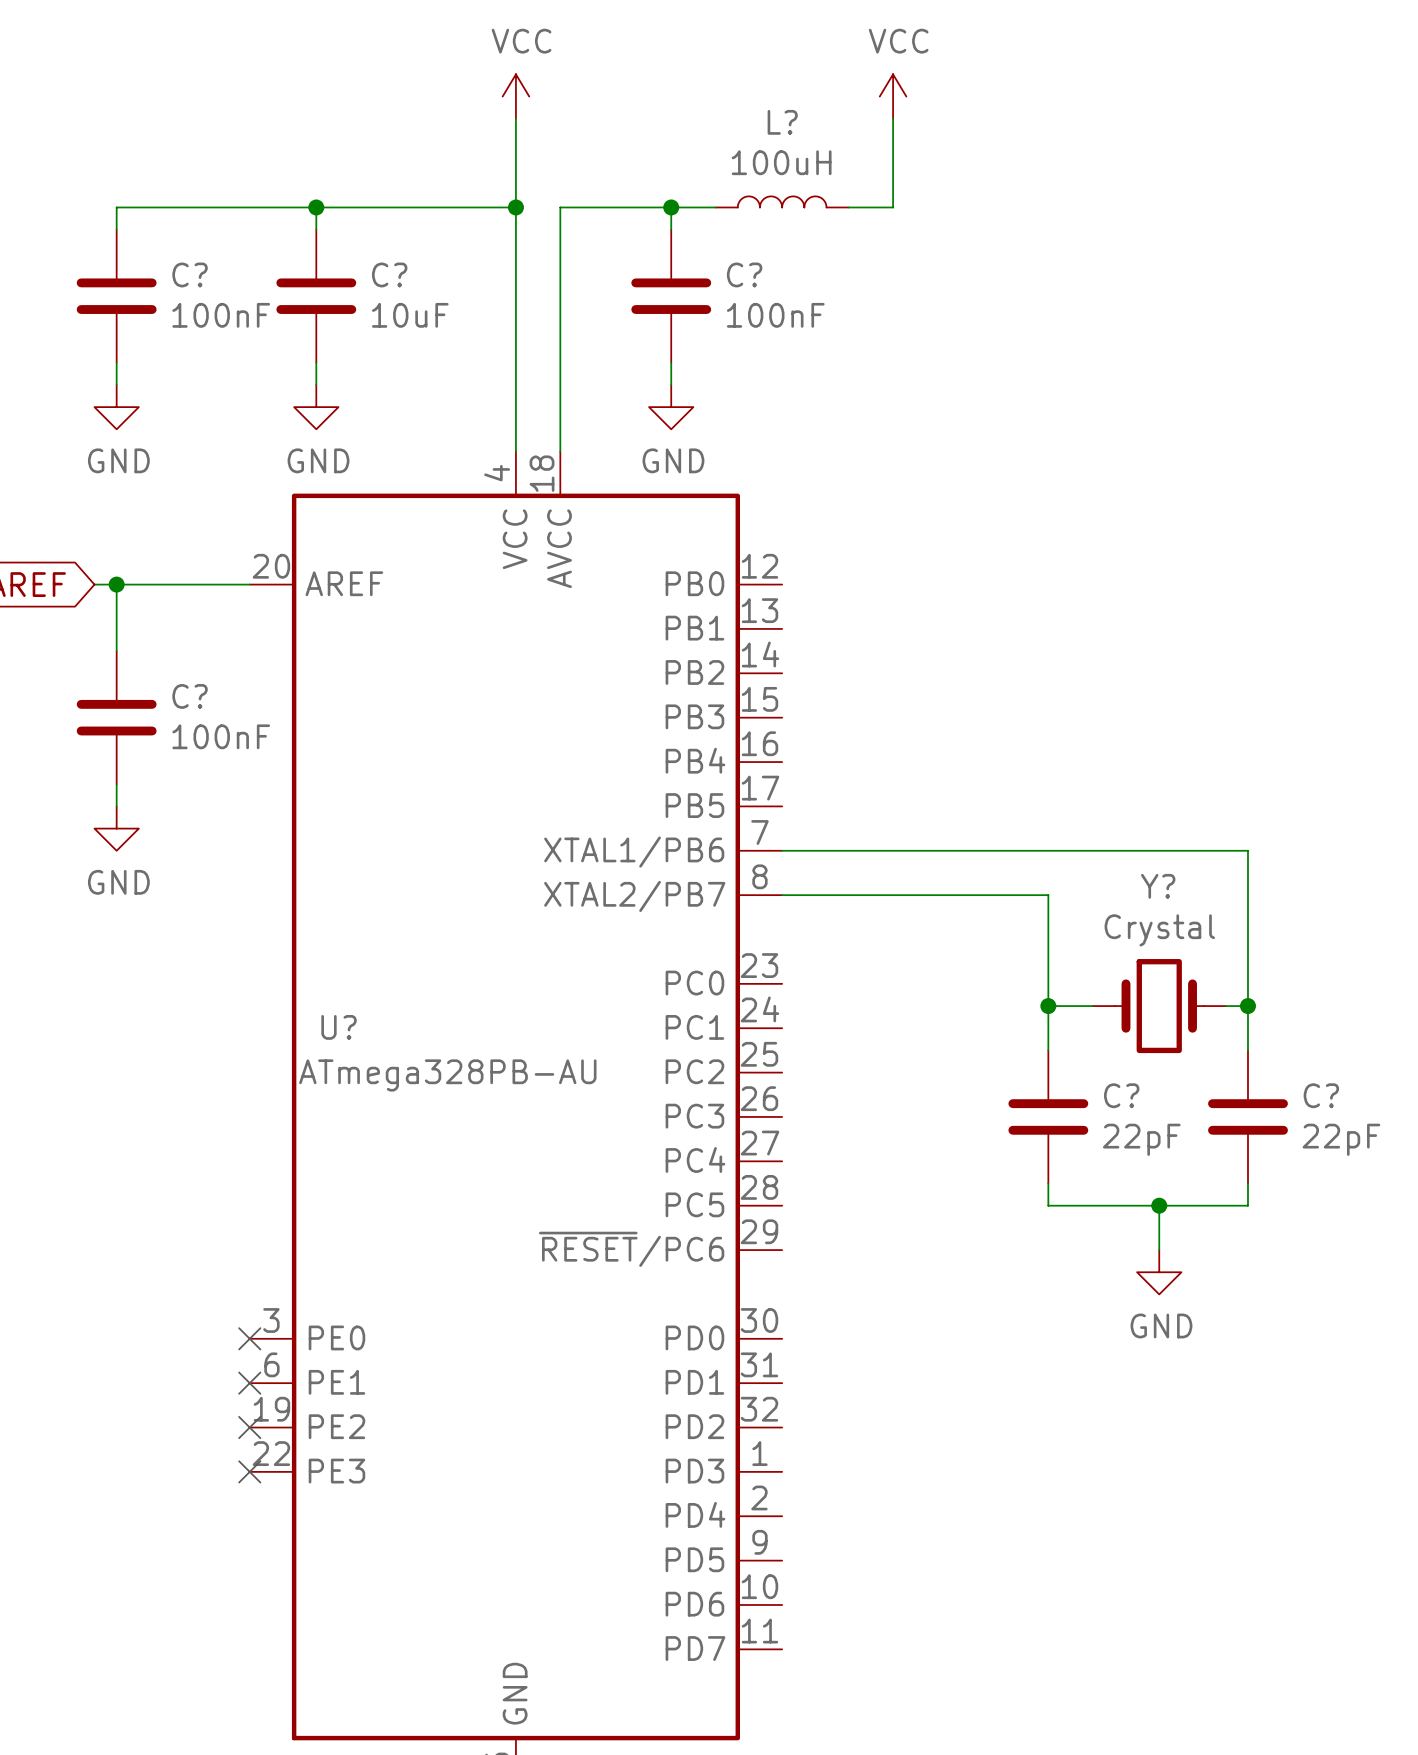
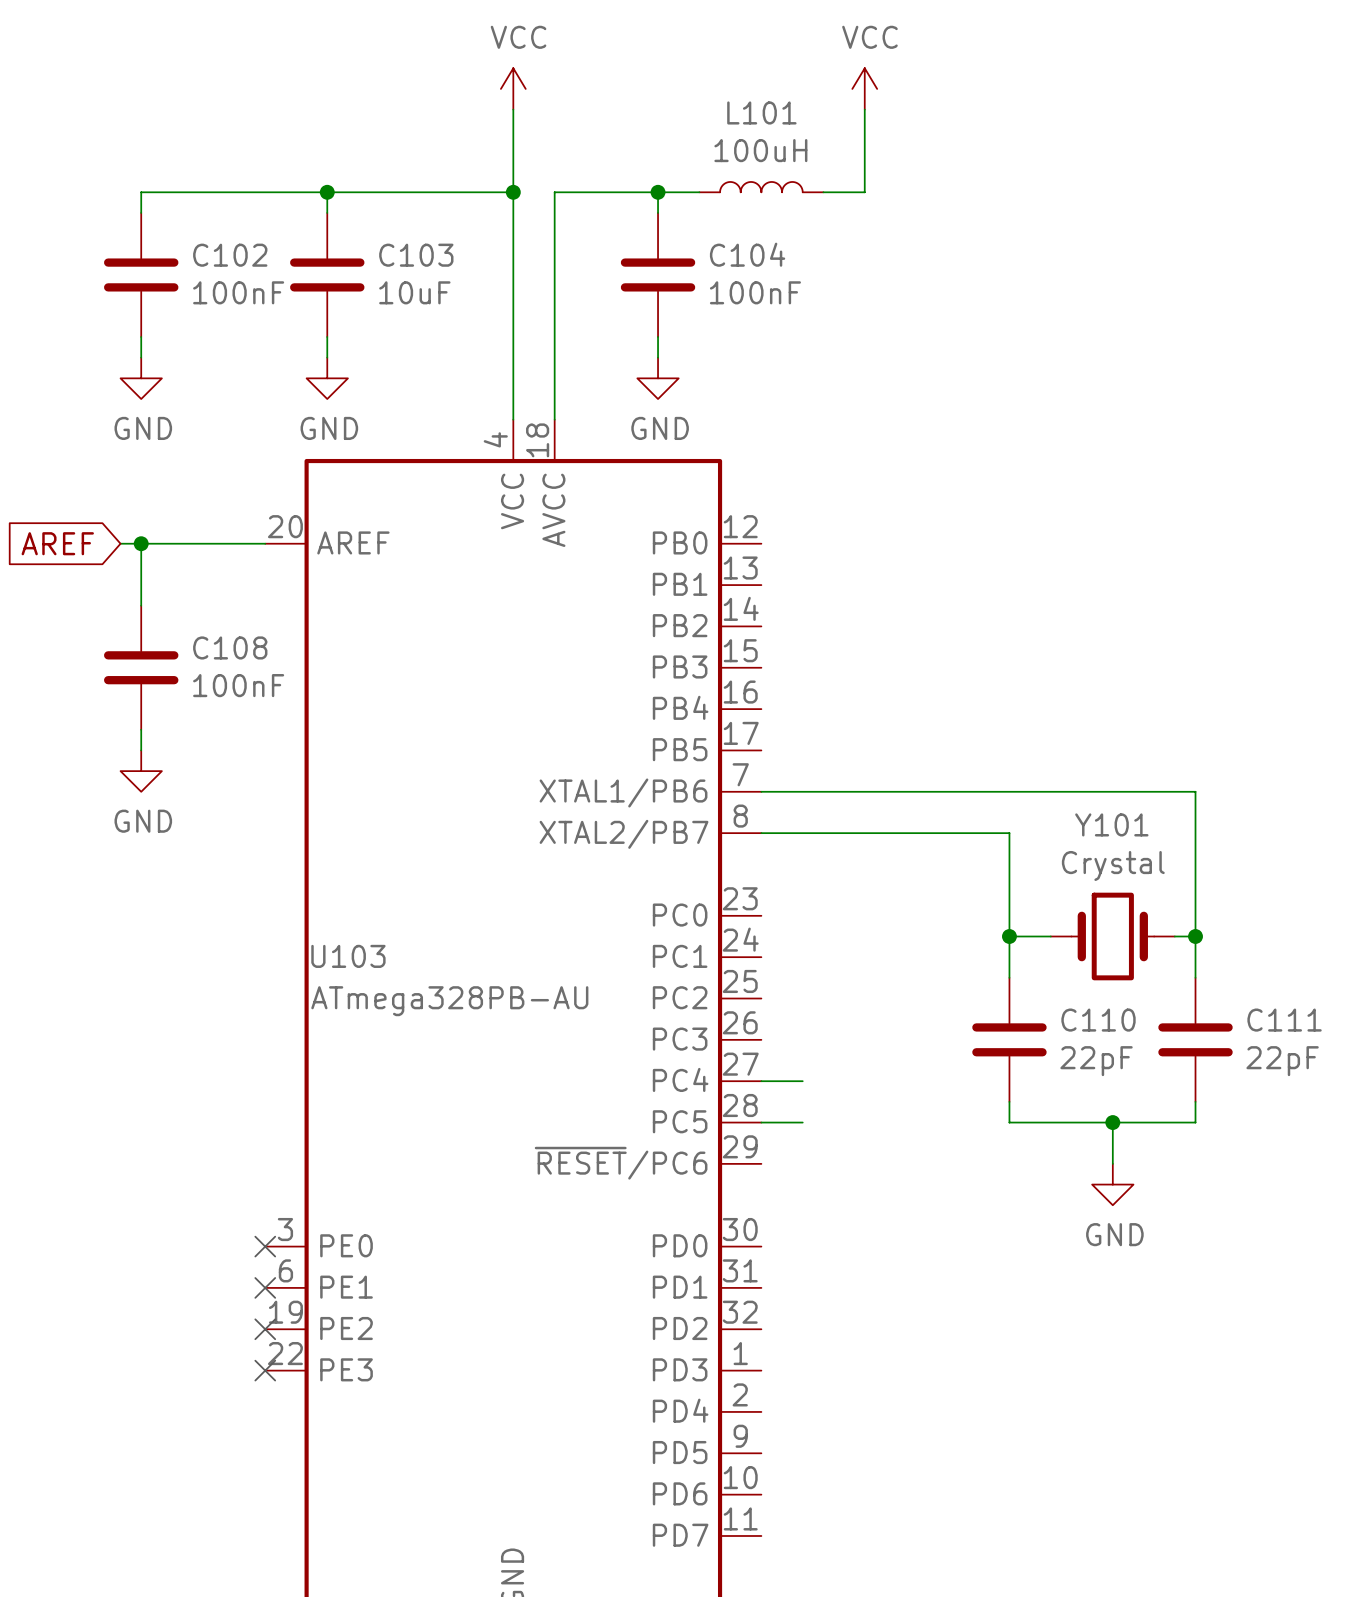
L? name: L? (782, 122) -> L101 (761, 112)
C? name: C? (190, 274) -> C102 (230, 255)
C? name: C? (389, 274) -> C103 (416, 255)
C? name: C? (744, 274) -> C104 (747, 254)
C? name: C? (190, 696) -> C108 (230, 647)
Y? name: Y? (1158, 886) -> Y101 (1111, 824)
U? name: U? (339, 1027) -> U103 (348, 956)
C? name: C? (1121, 1095) -> C110 (1098, 1020)
C? name: C? (1321, 1095) -> C111 (1284, 1020)
wire: none -> (761, 1081) (802, 1081)
wire: none -> (761, 1122) (802, 1122)

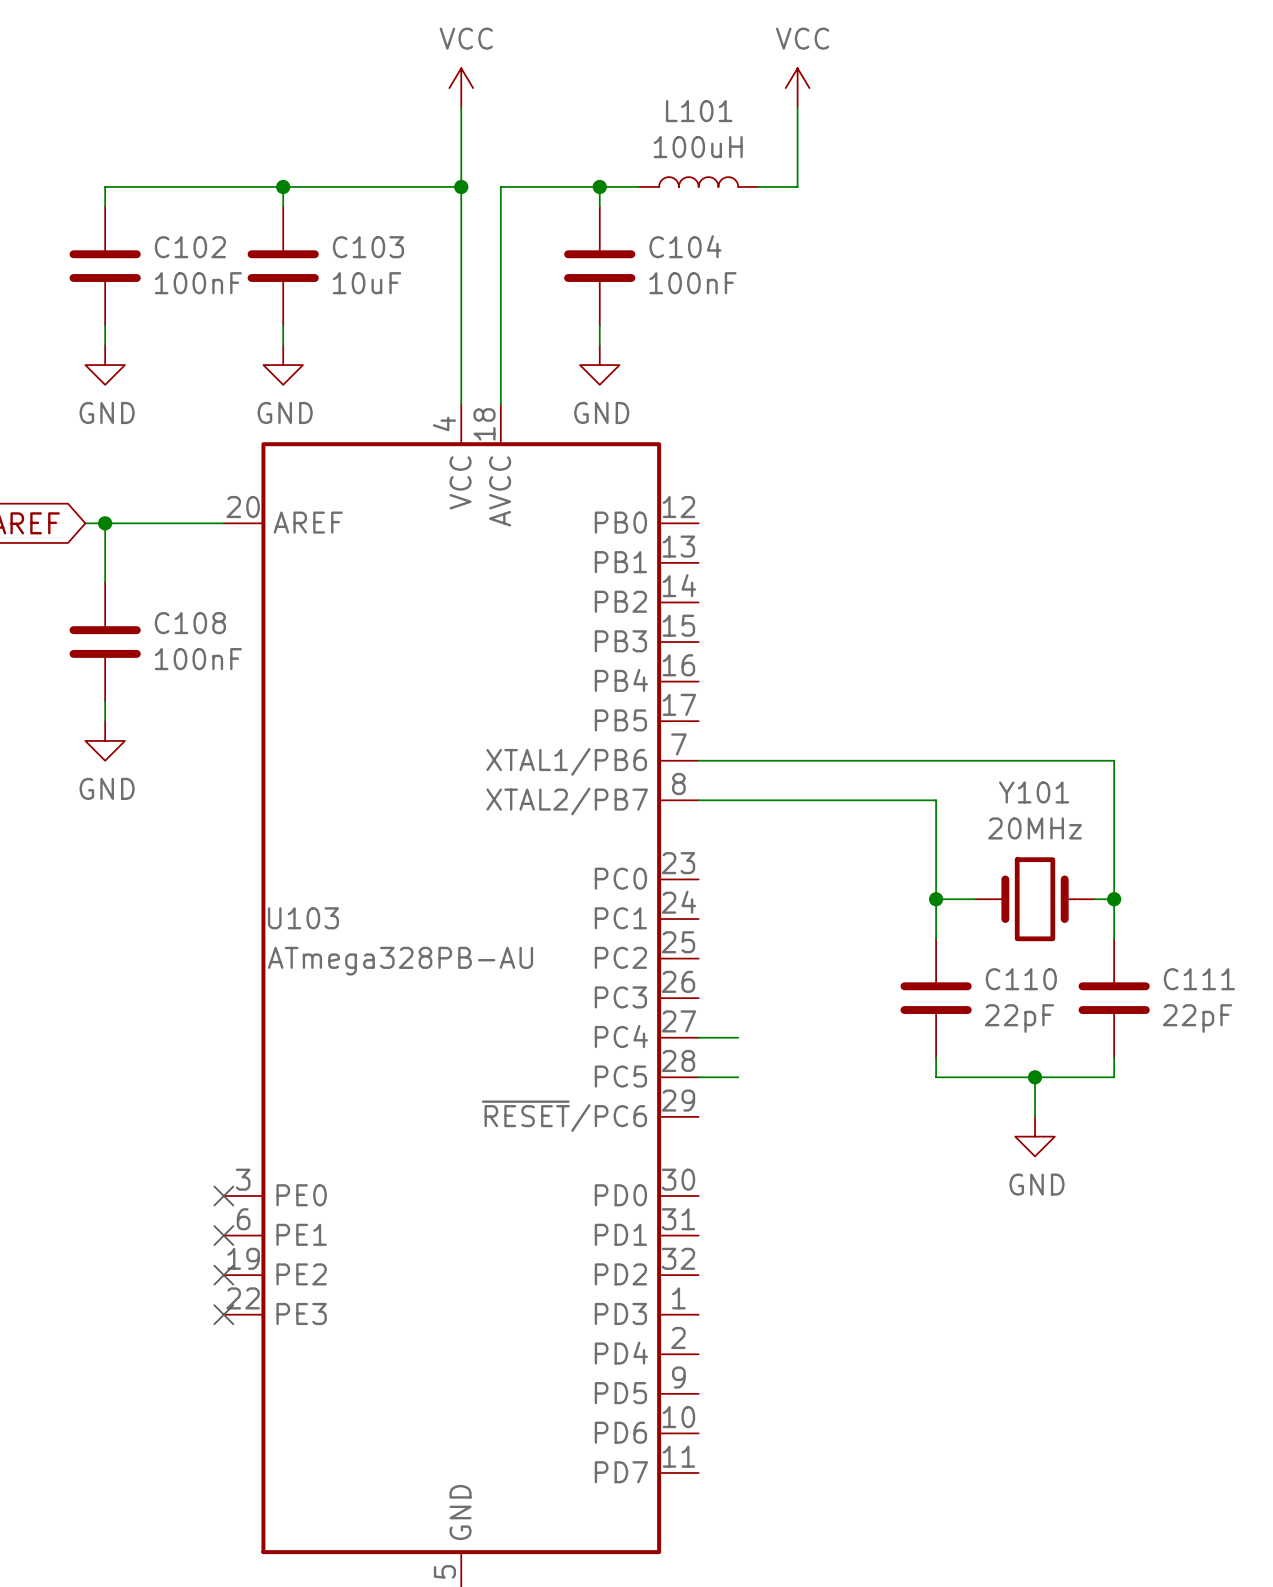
Y101 value: Crystal (1113, 865) -> 20MHz (1035, 828)

